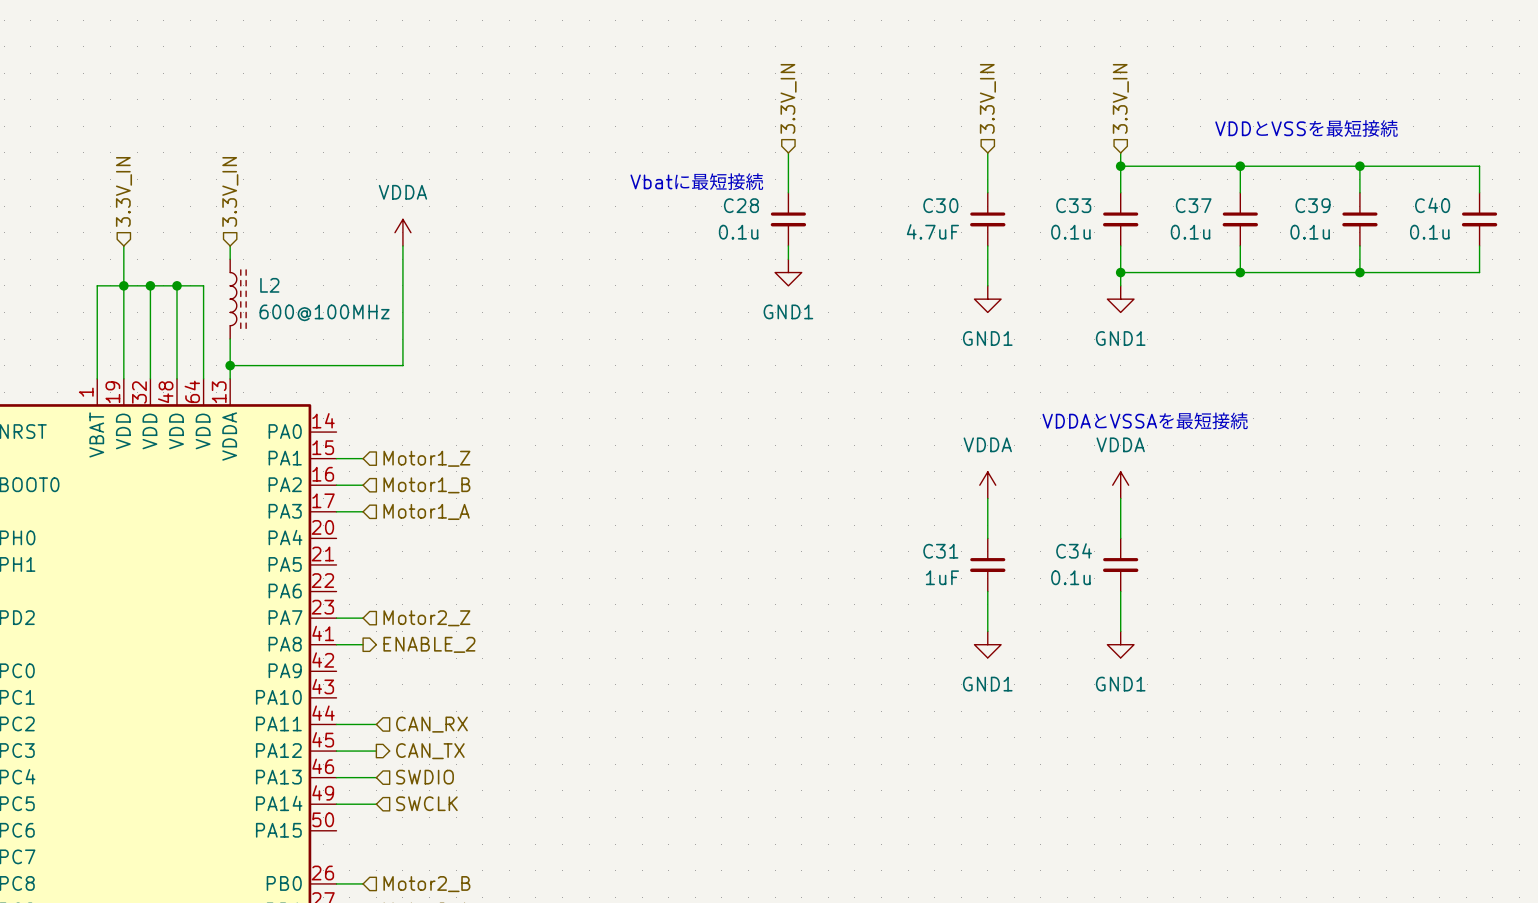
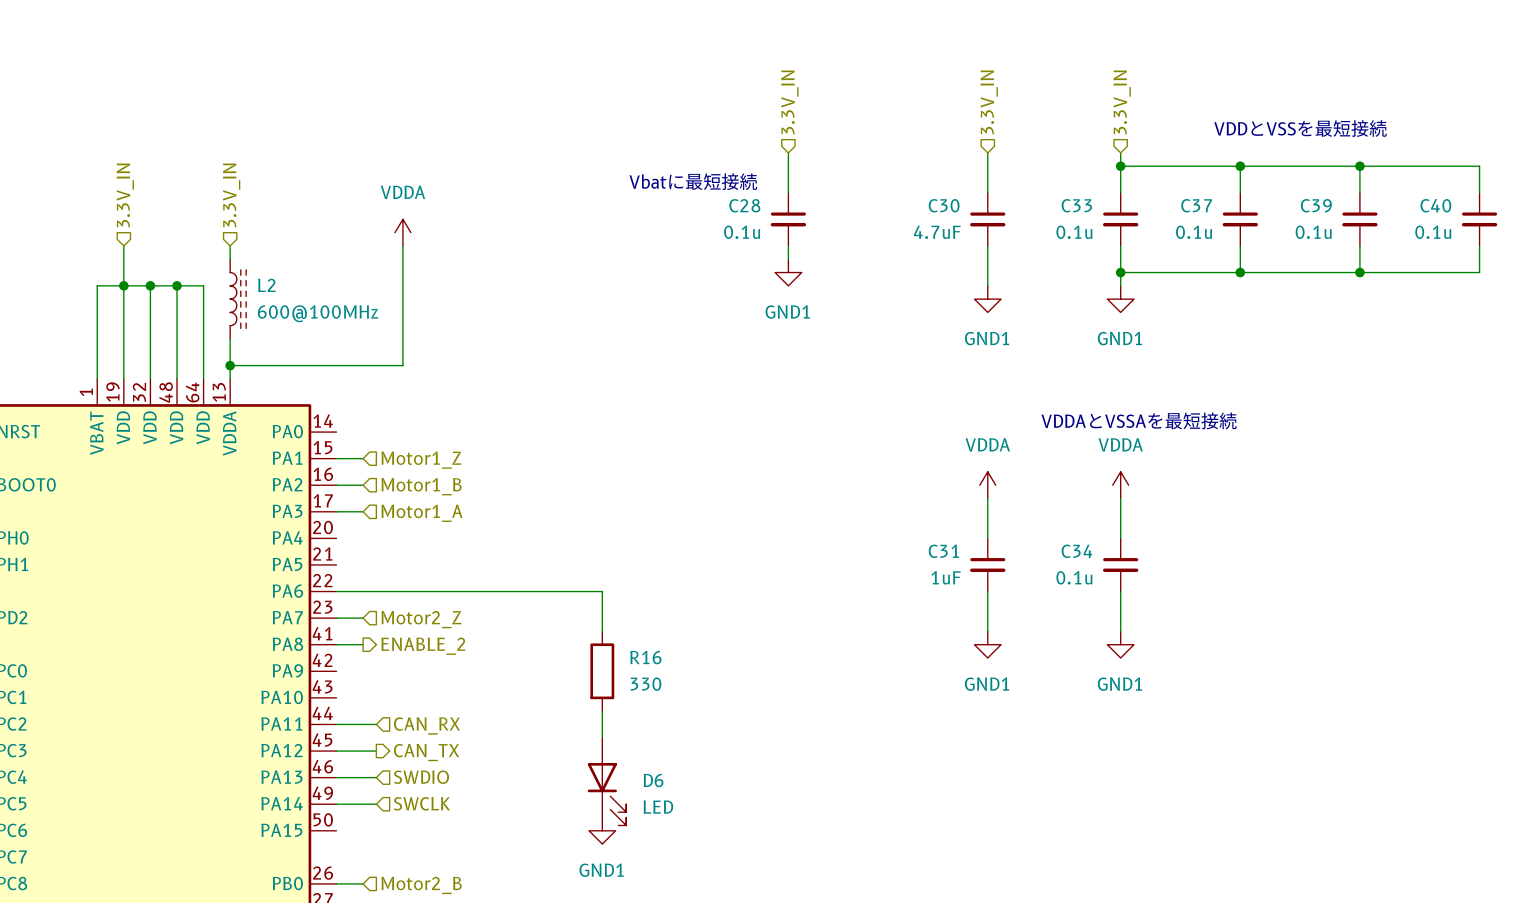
wire: none -> (336, 591) (602, 591) (602, 631)
R16: none -> 330 (602, 671)
wire: none -> (602, 711) (602, 737)
D6: none -> LED (606, 781)
power symbol: none -> GND1 (602, 830)

